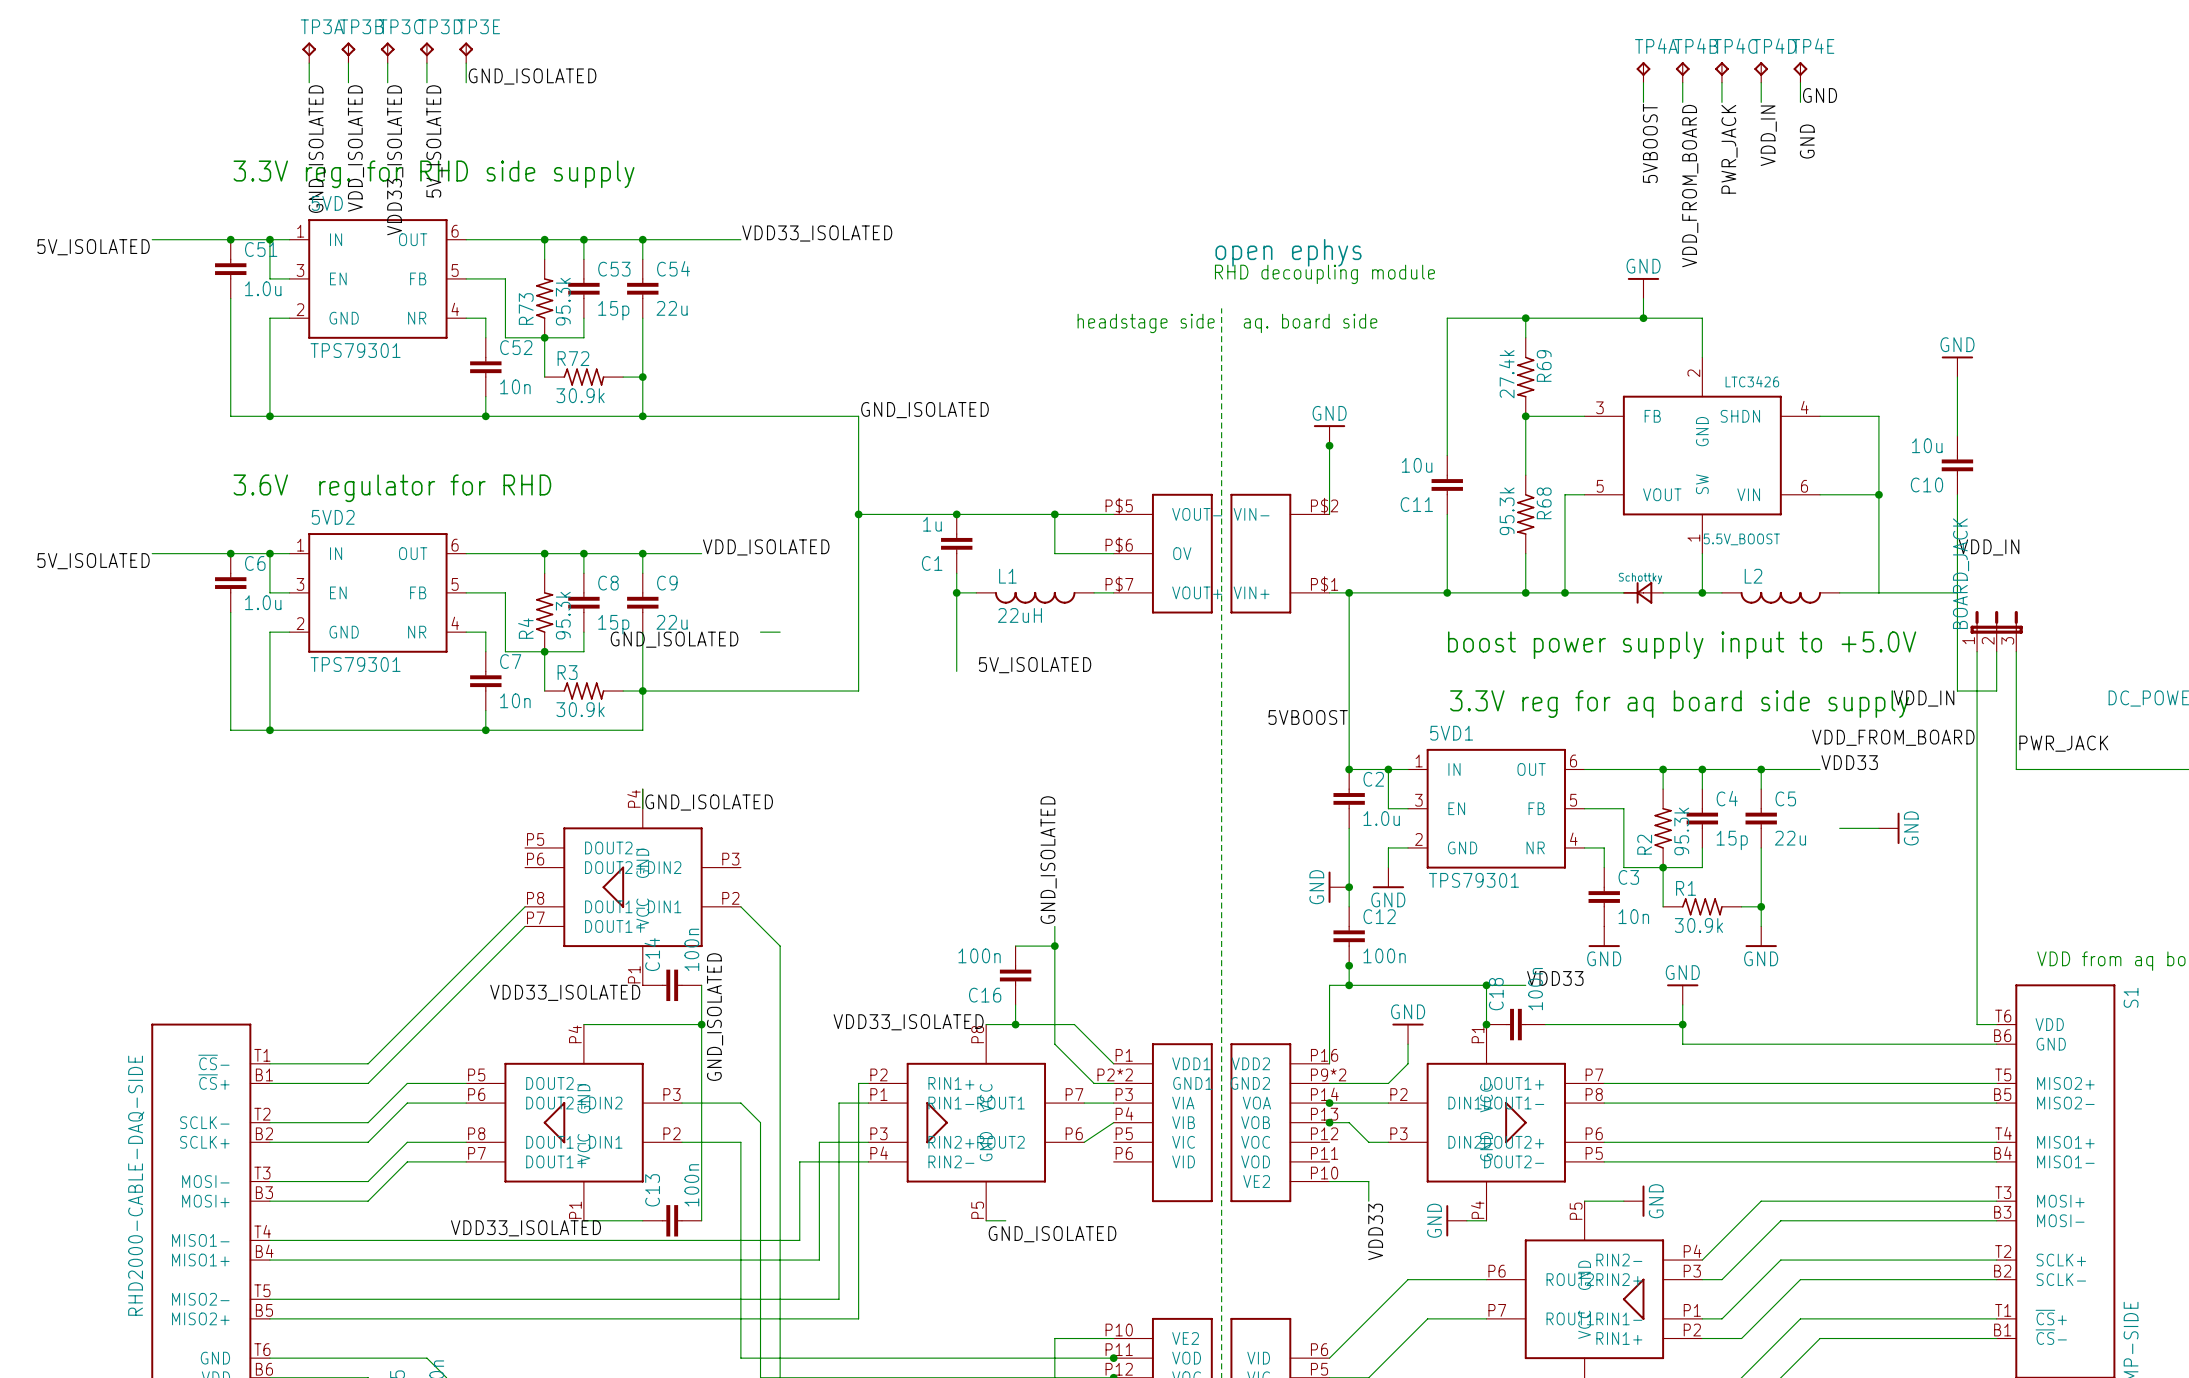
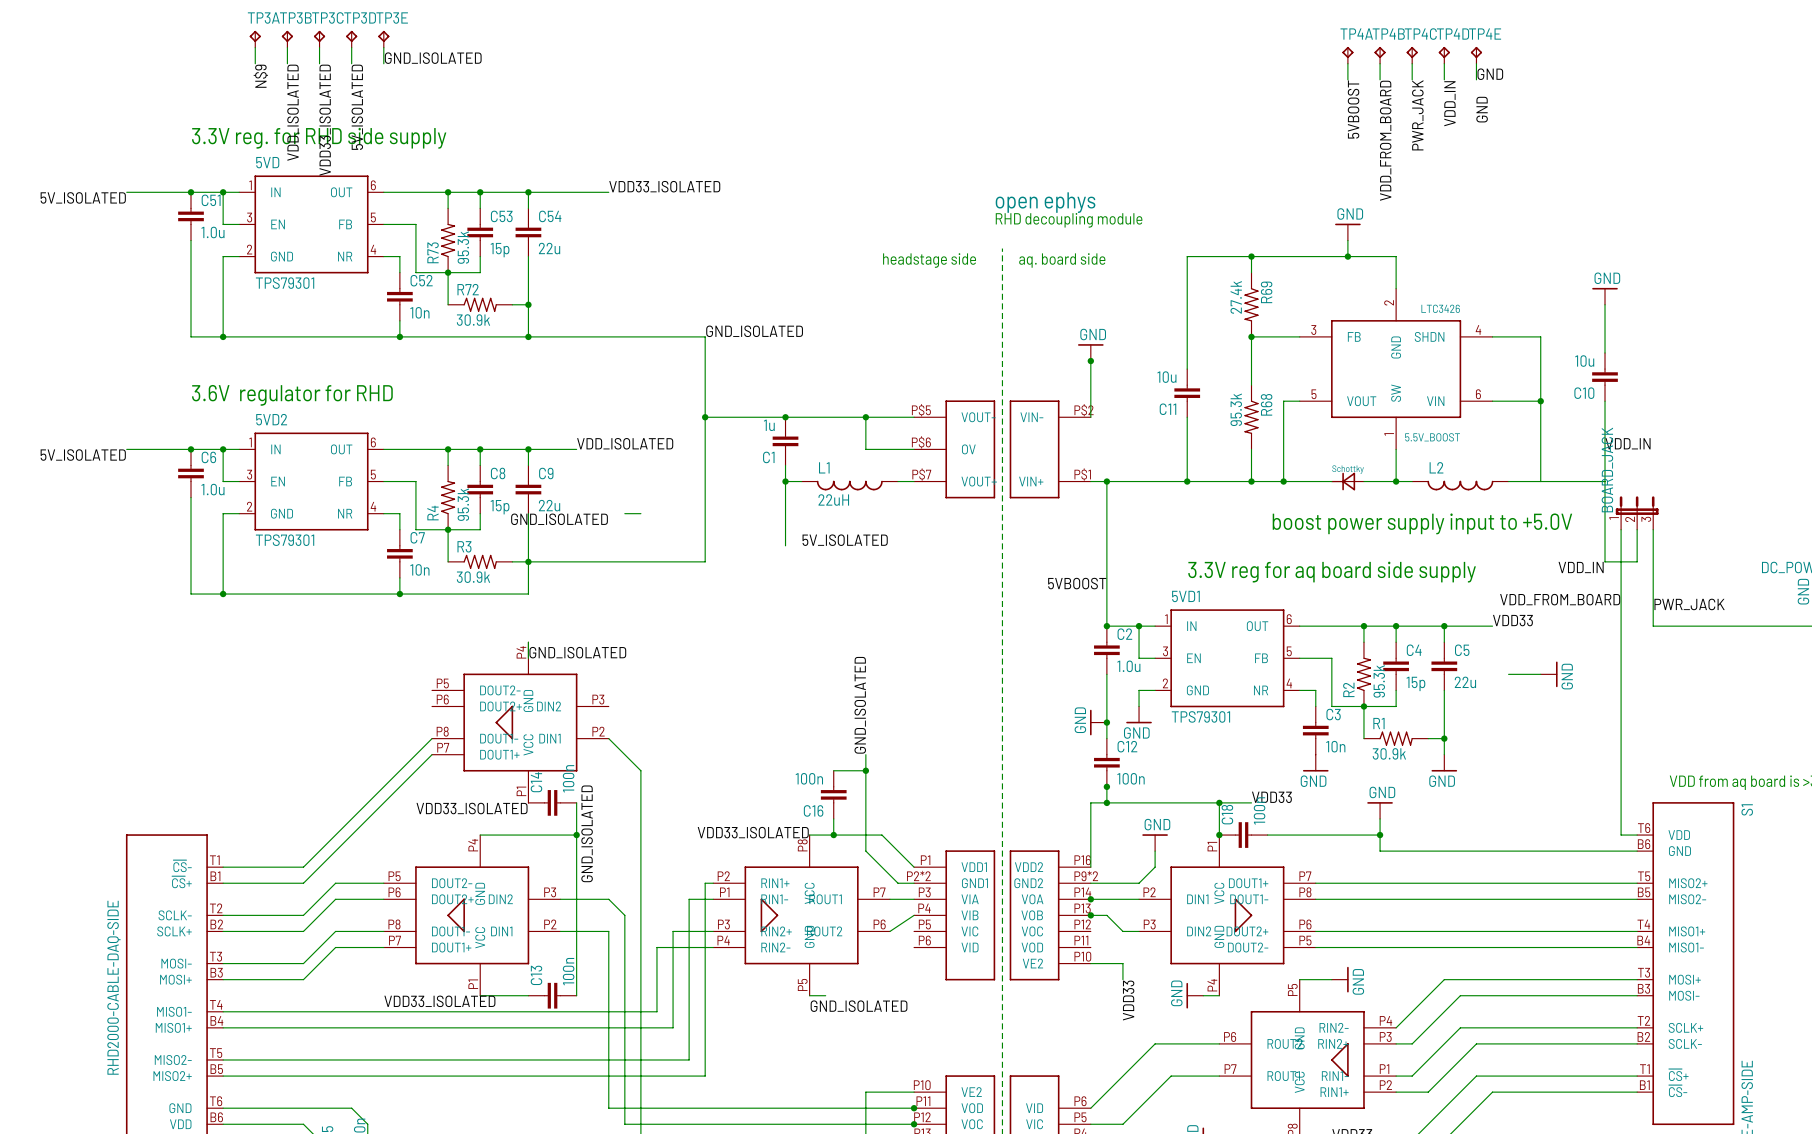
label: GND_ISOLATED (316, 149) -> N$9 (260, 76)

